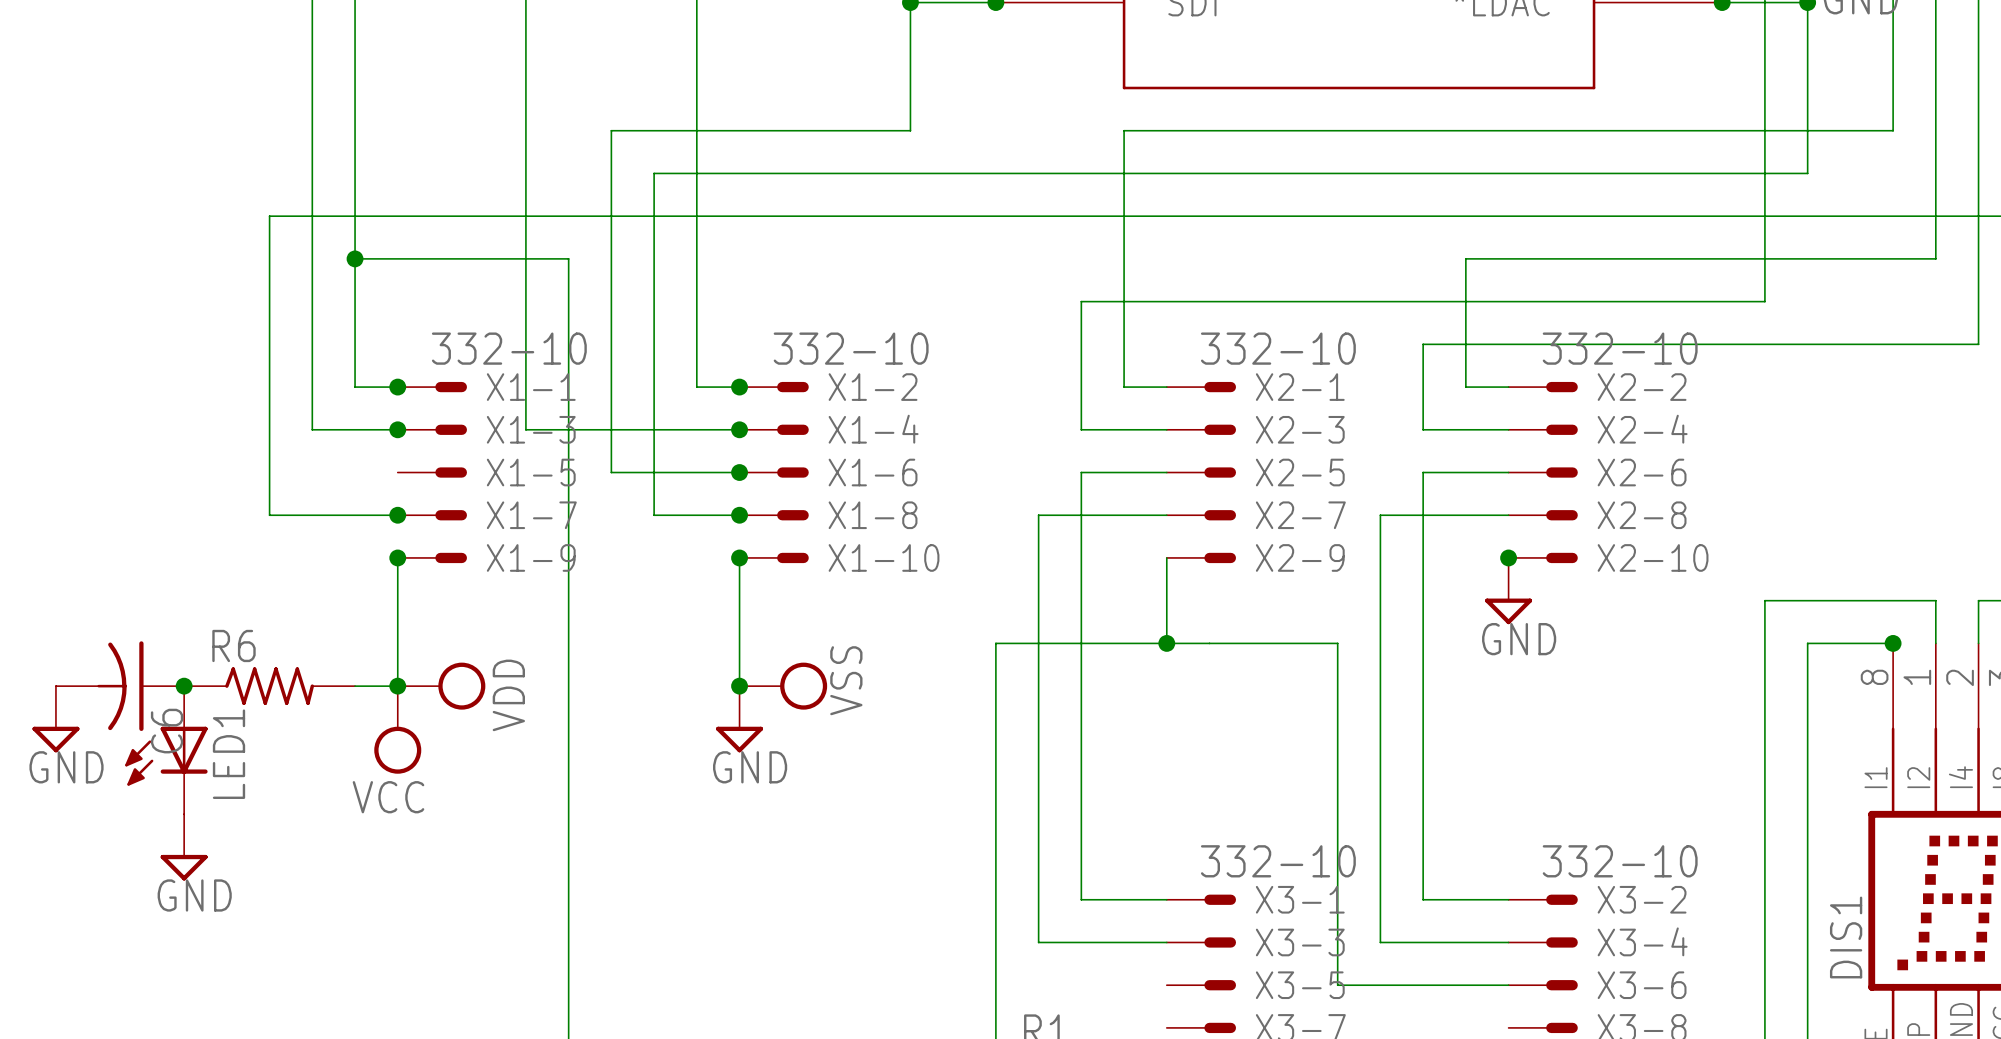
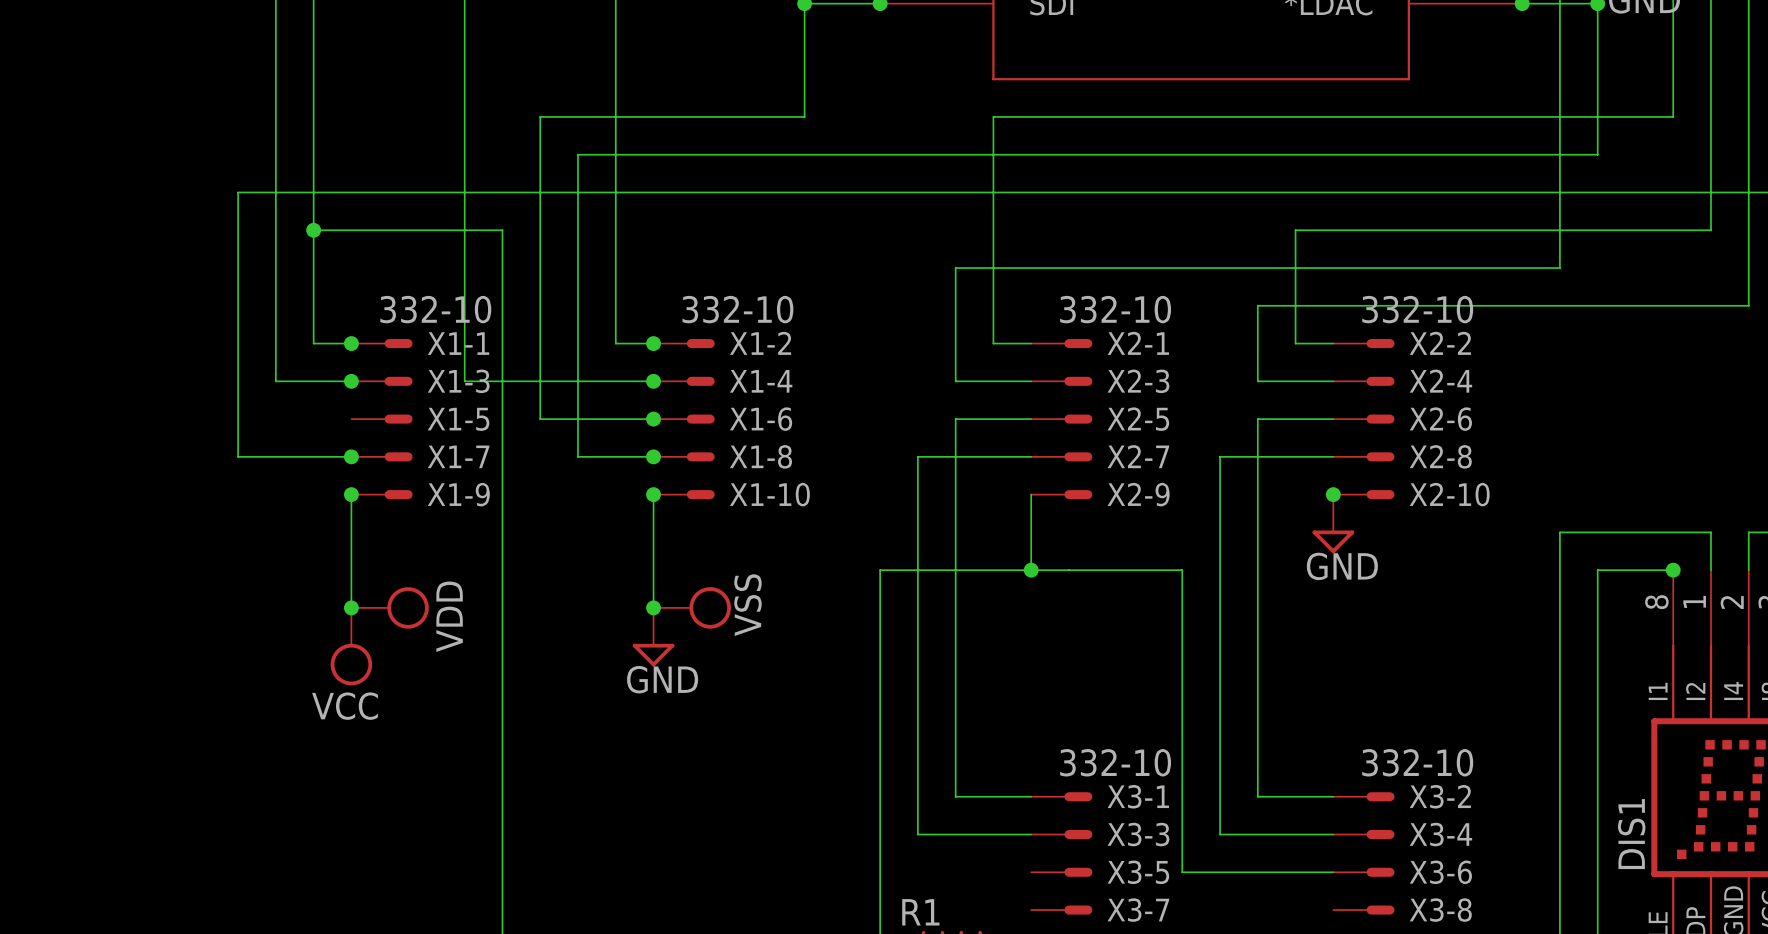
C6: (120, 686) -> none
junction: (184, 686) -> none
R6: (269, 686) -> none
wire: (355, 686) (397, 686) -> none
power symbol: GND (55, 719) -> none
LED1: (166, 750) -> none
power symbol: GND (184, 847) -> none

